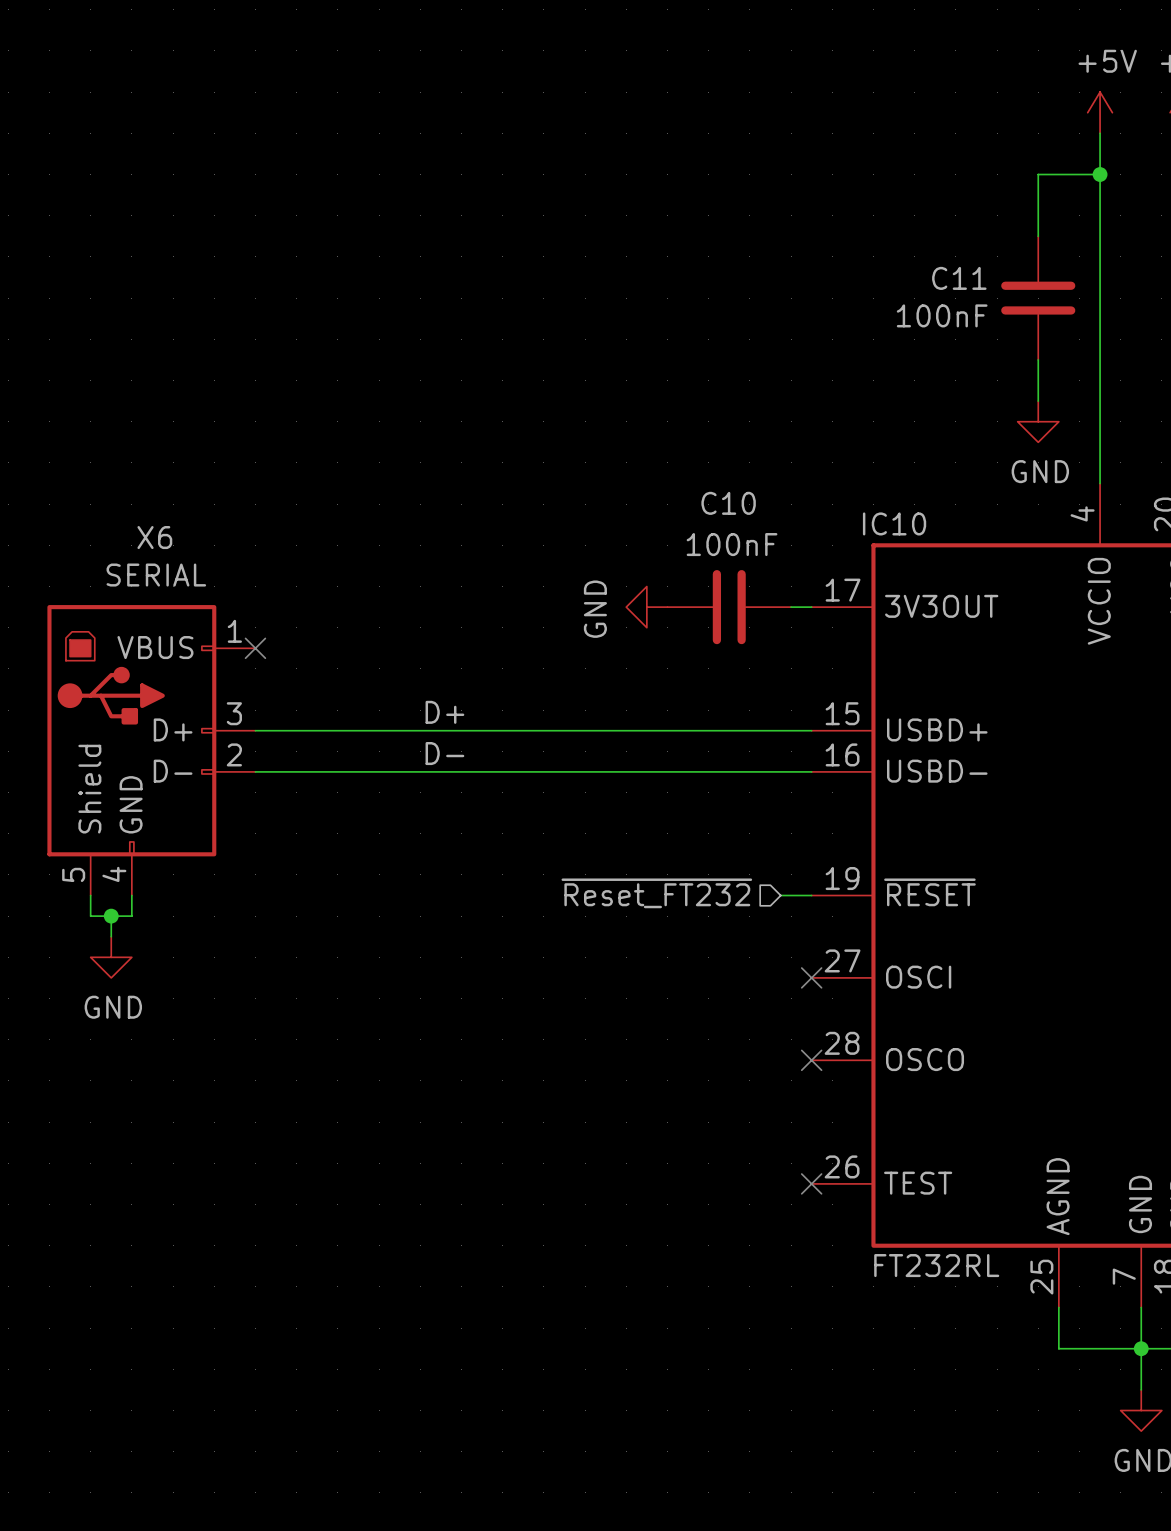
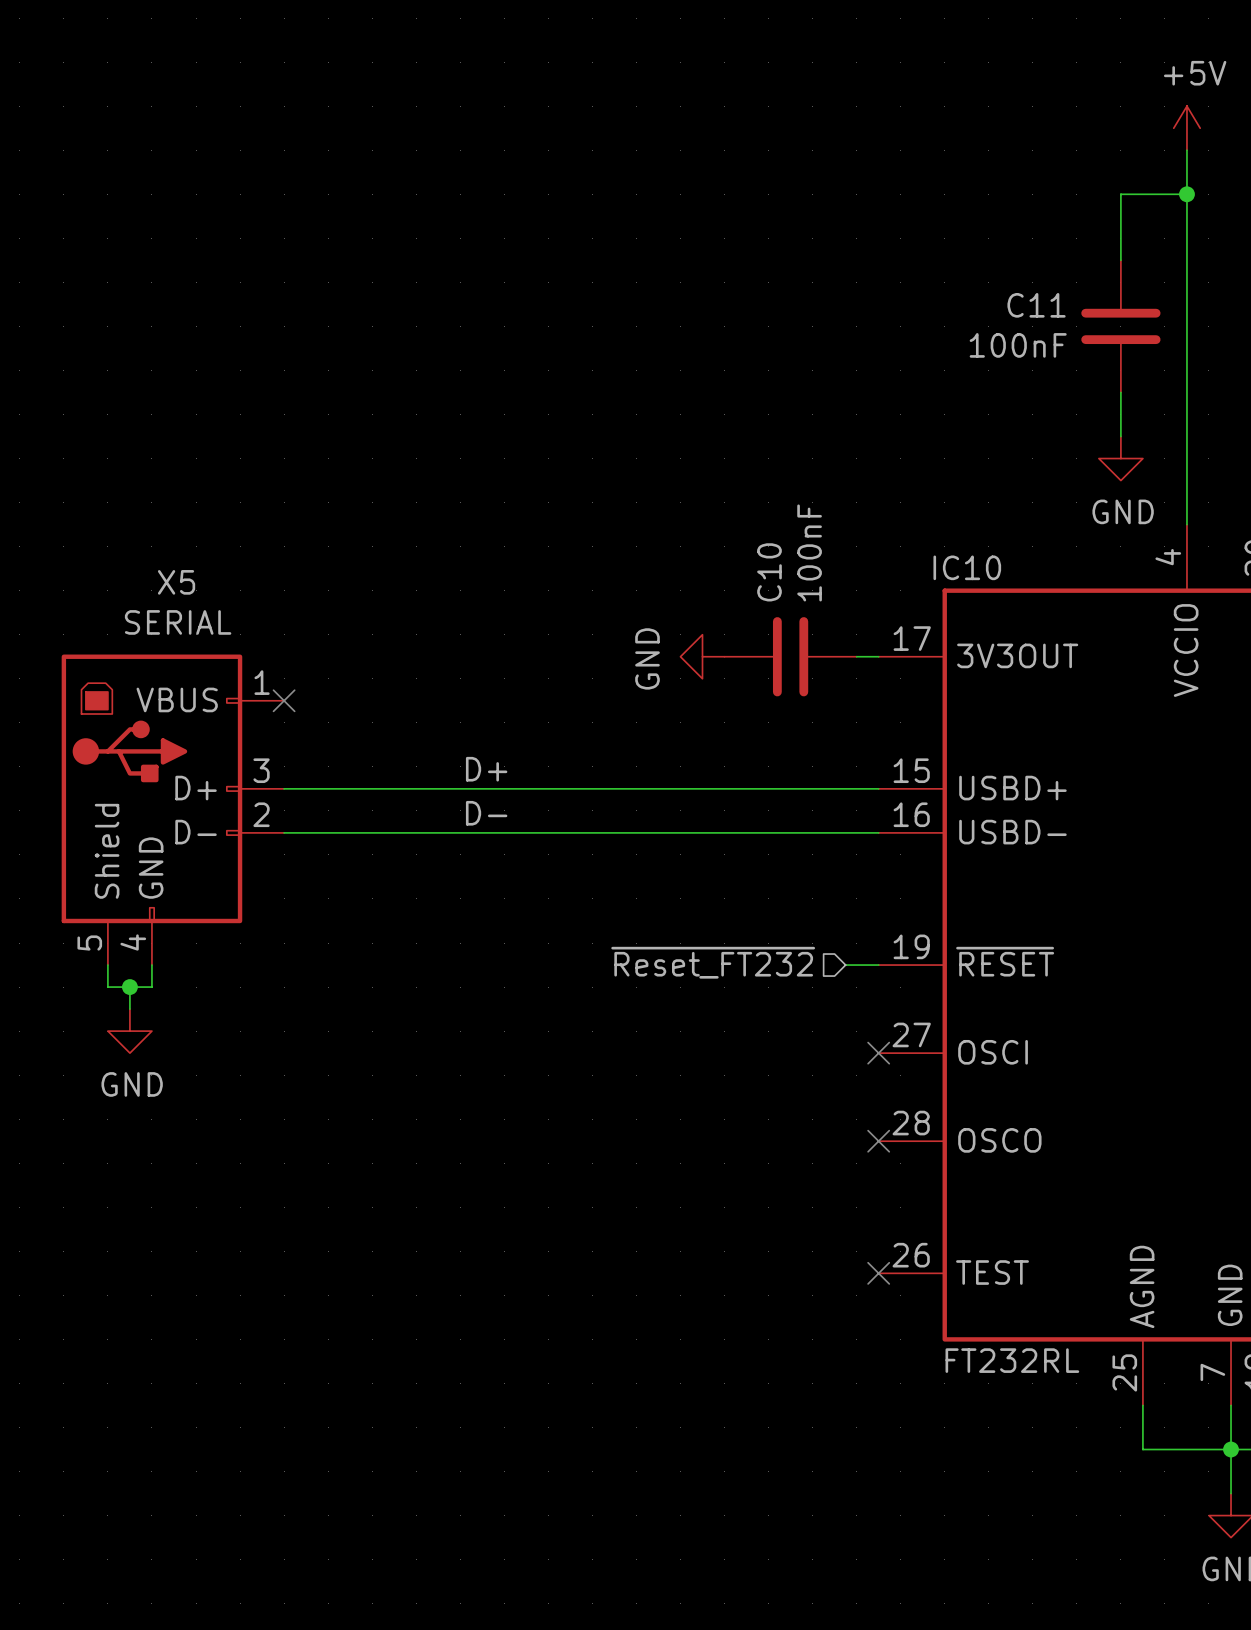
C10 name rotation: 0° (728, 503) -> 90° counterclockwise (769, 572)
X6 name: X6 (154, 537) -> X5 (176, 582)
C10 value rotation: 0° (732, 544) -> 90° counterclockwise (809, 552)

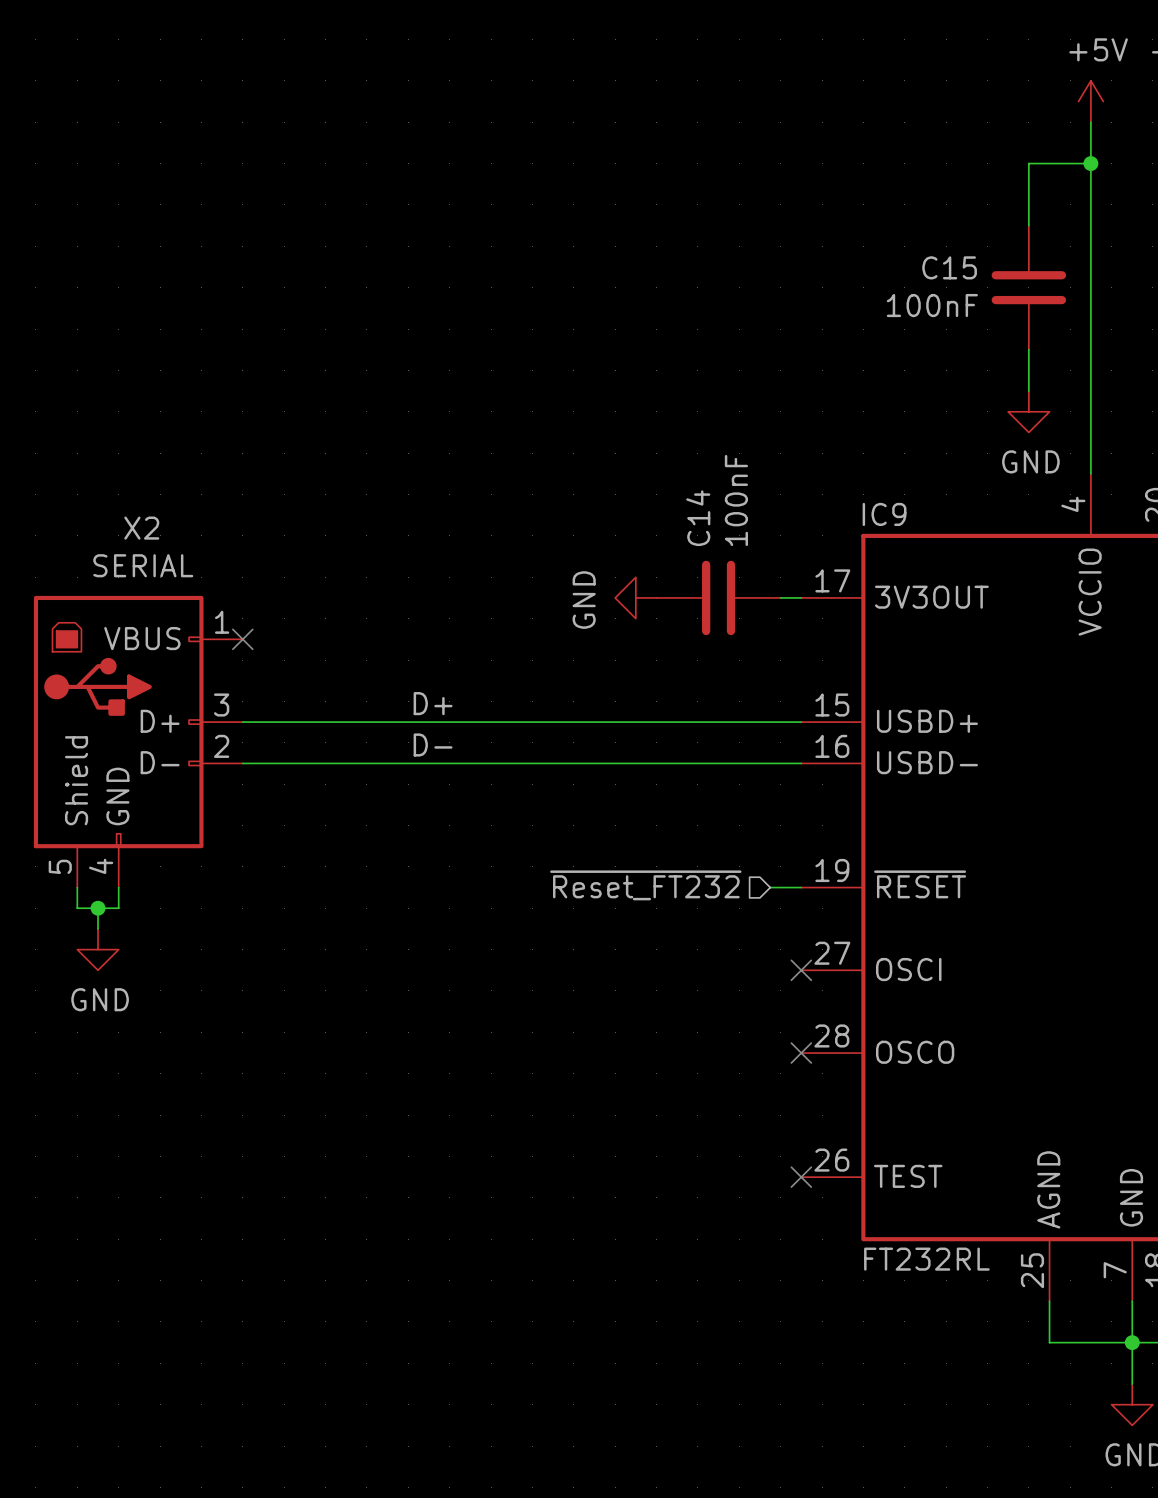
C11 name: C11 (1036, 305) -> C15 (949, 267)
IC10 name: IC10 (967, 567) -> IC9 (884, 514)
C10 name: C10 (769, 572) -> C14 (698, 518)
X5 name: X5 (176, 582) -> X2 (141, 528)

